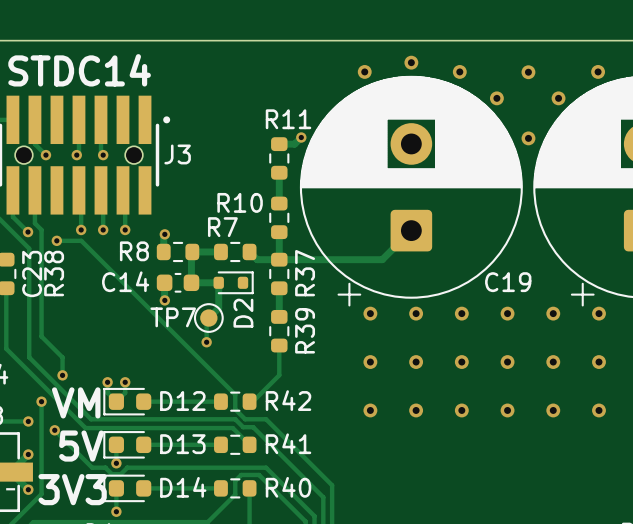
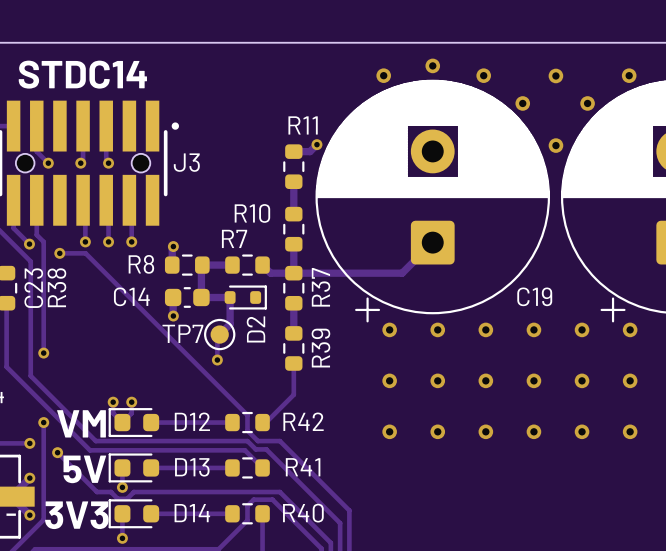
track: (41, 335) (62, 357) (62, 375) -> none
via position: (62, 375) -> (43, 353)

